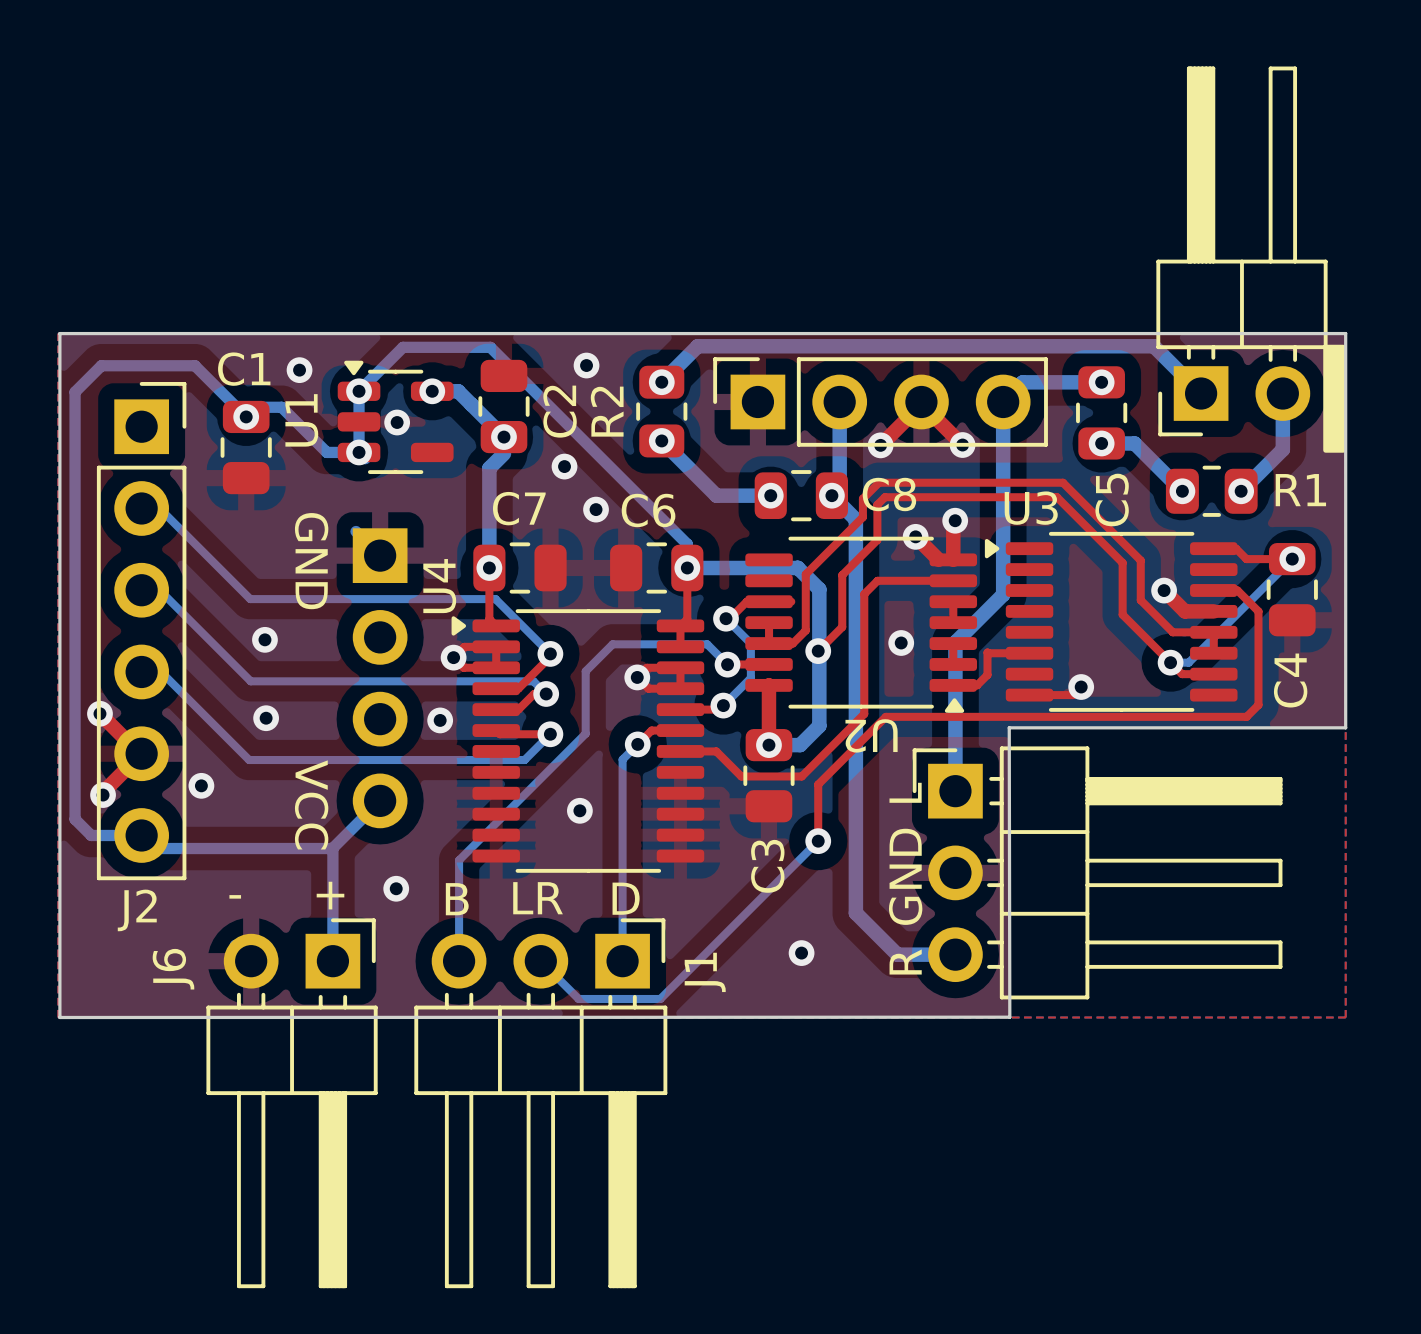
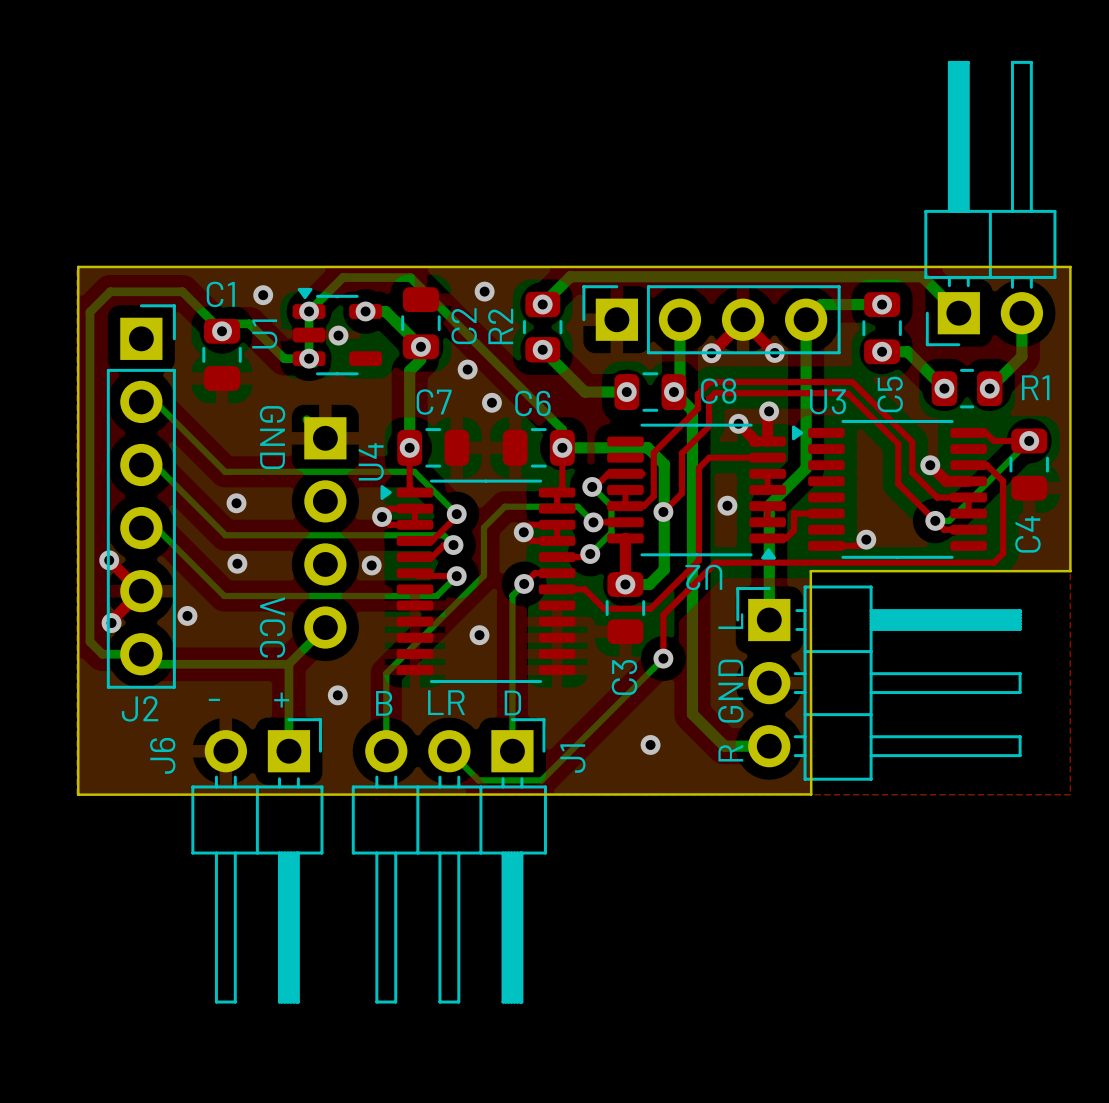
drawing: [1323, 344, 1346, 453] -> none

